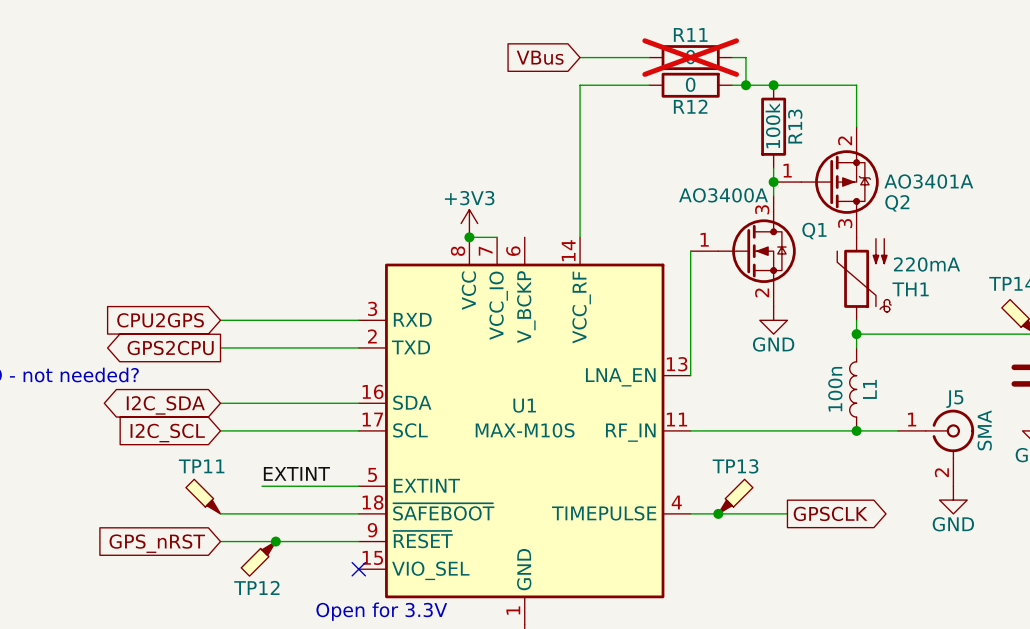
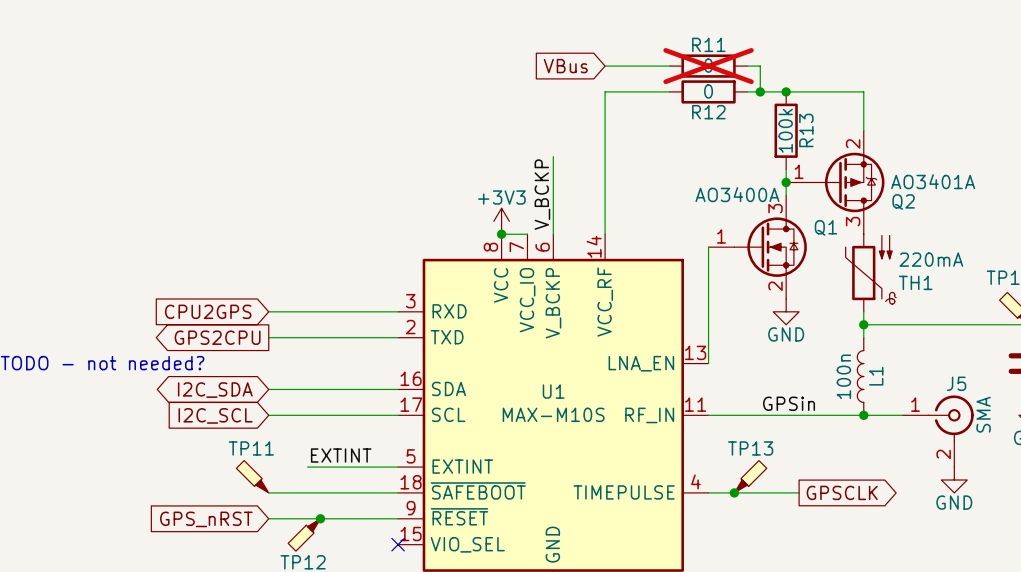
wire: none -> (553, 156) (553, 234)
label: none -> V_BCKP (542, 194)
label: none -> GPSin (789, 403)

